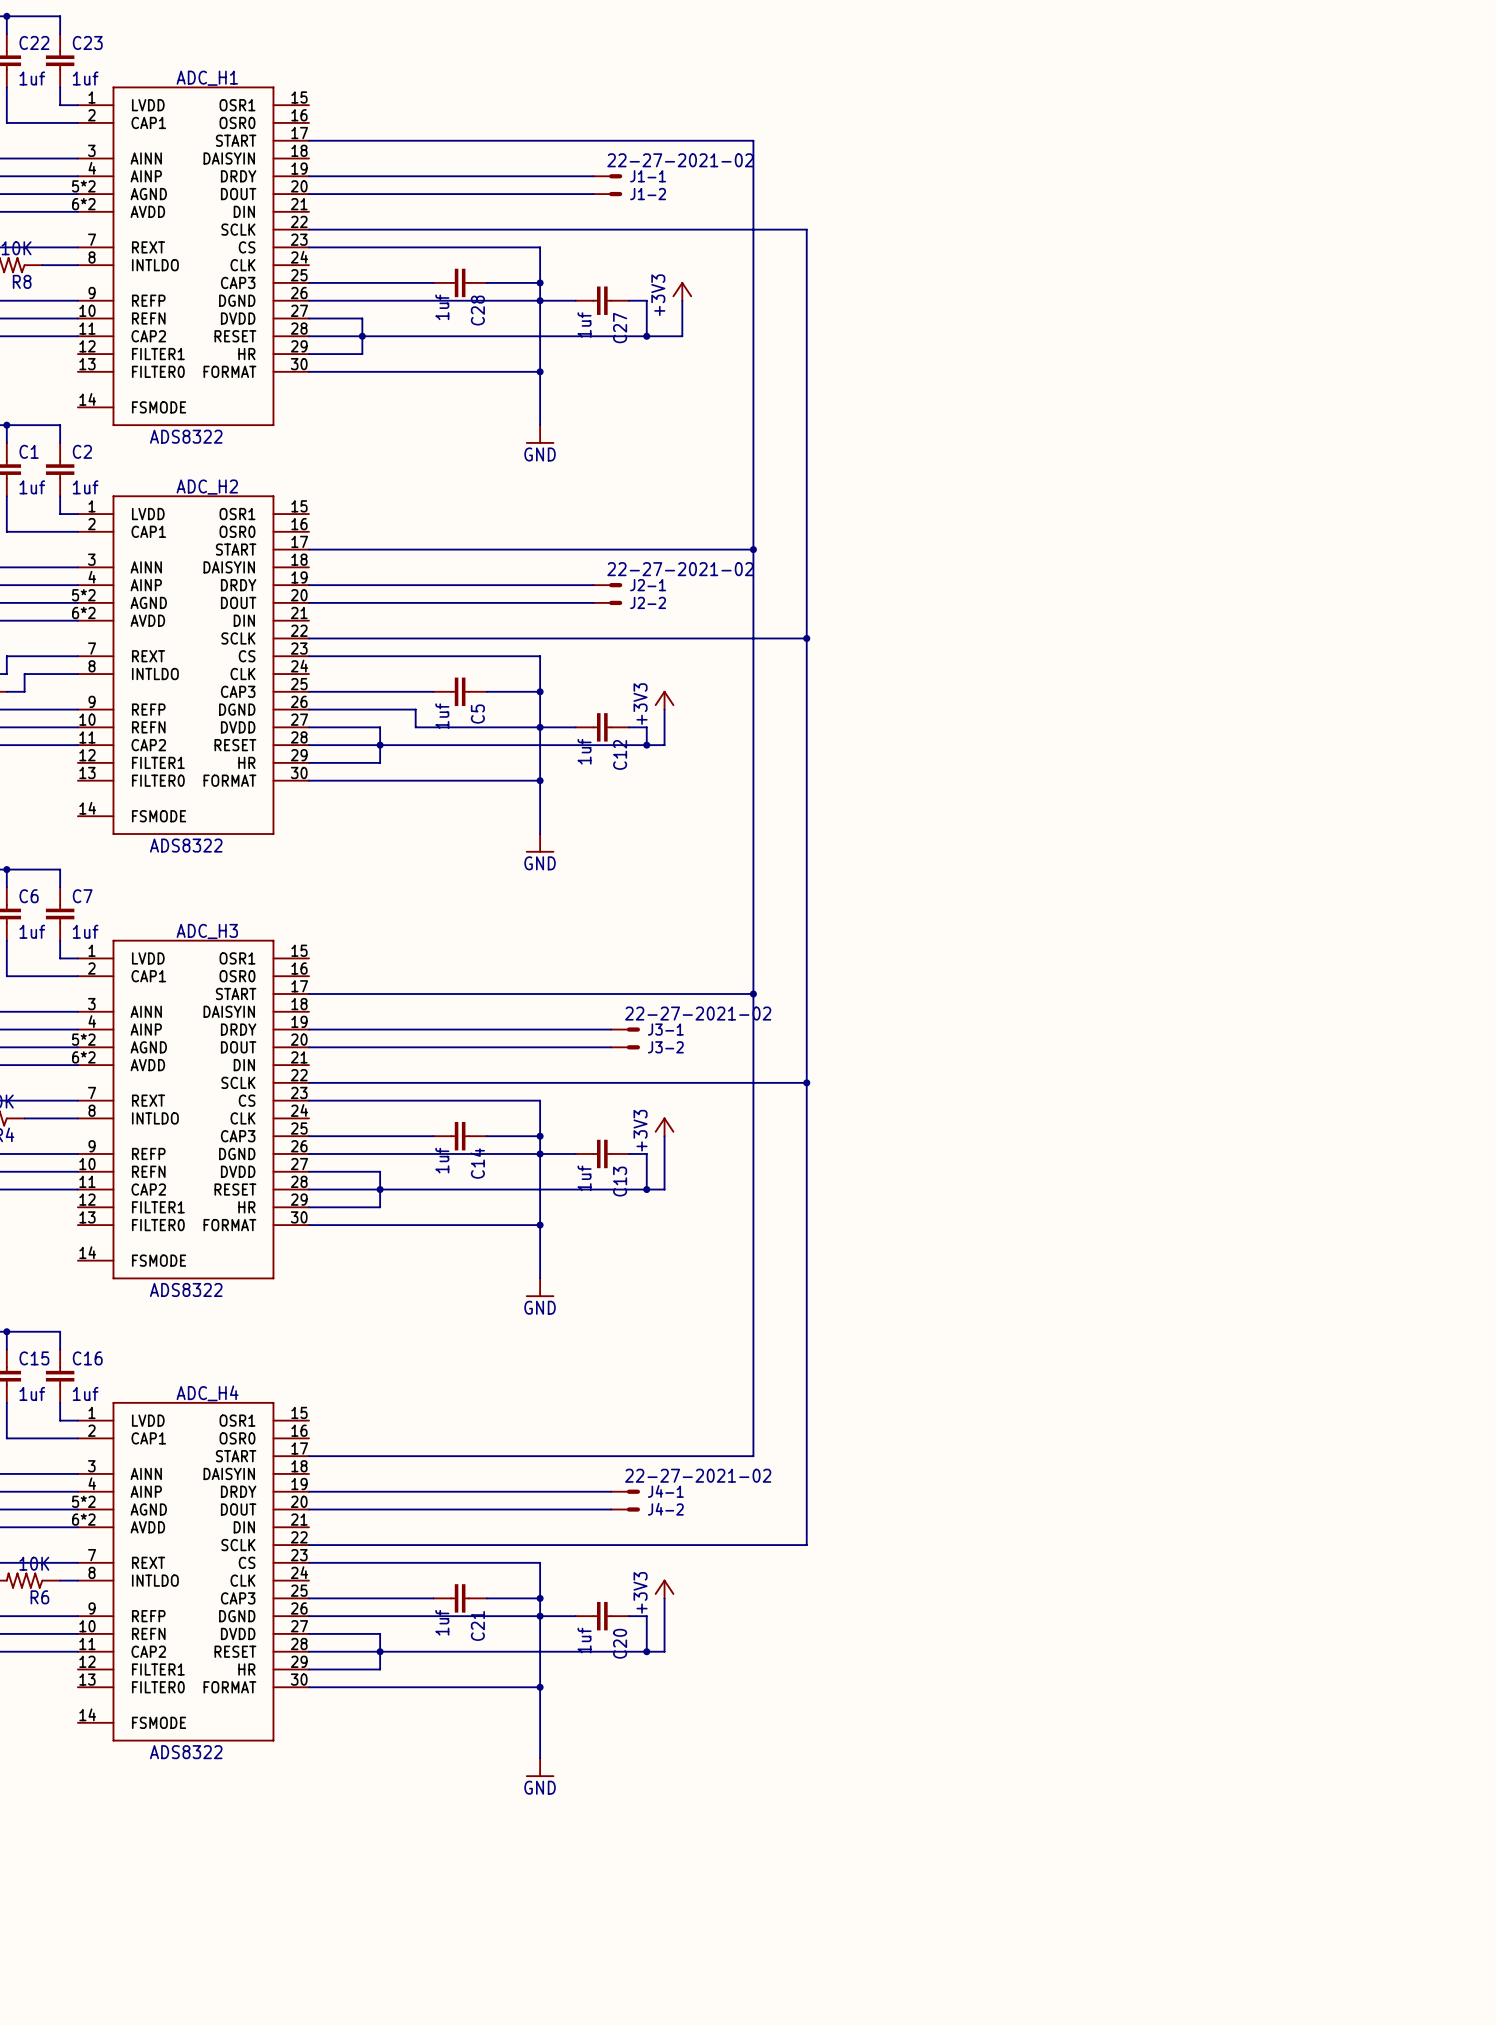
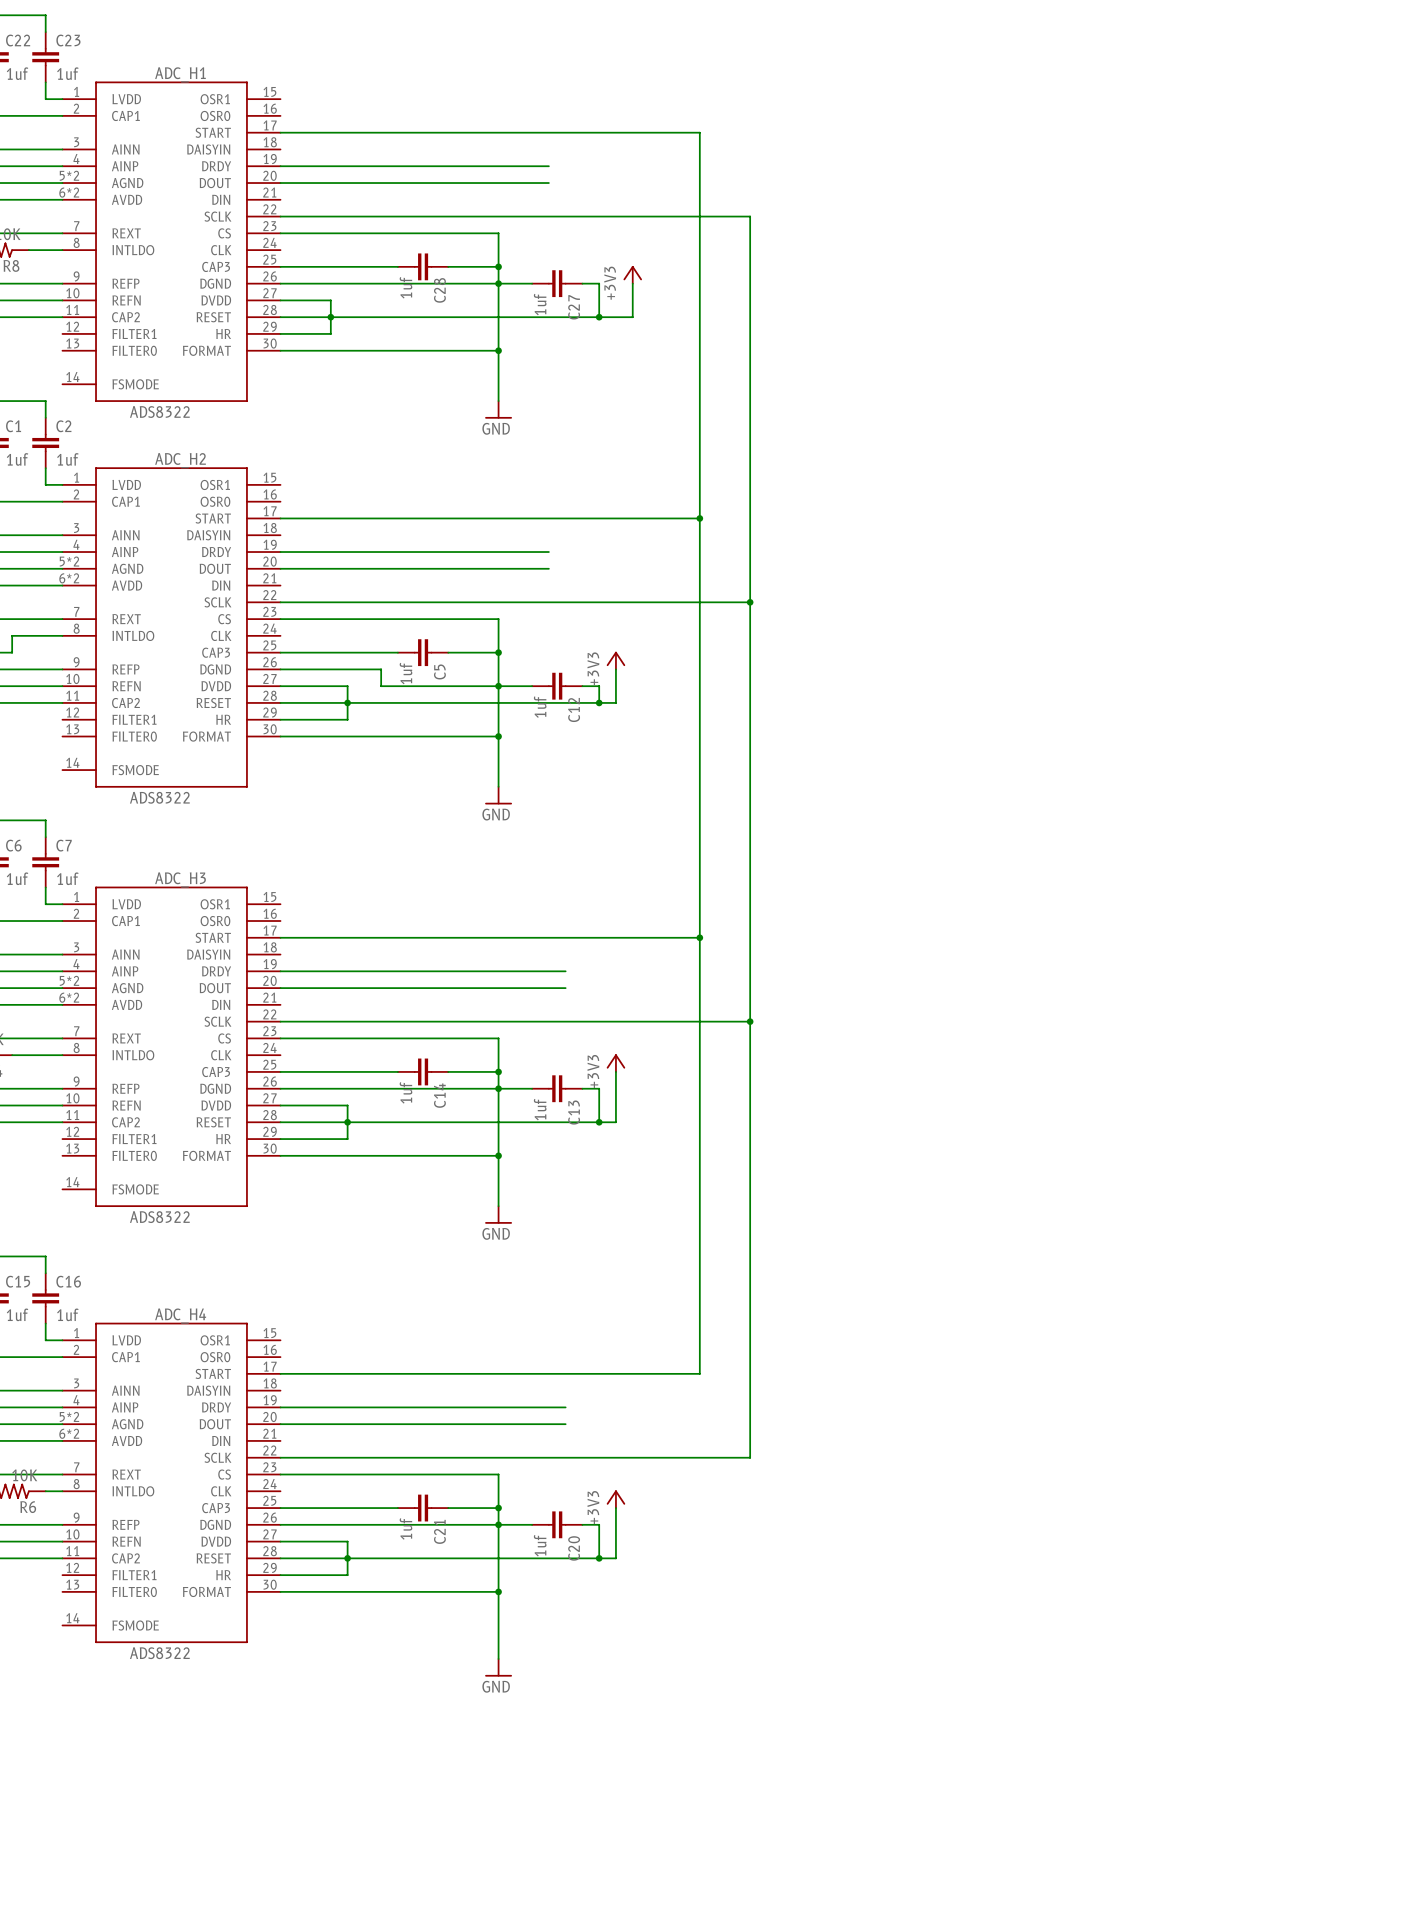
J1-1: 22-27-2021-02 (607, 176) -> none
J1-2: (607, 194) -> none
J2-1: 22-27-2021-02 (607, 585) -> none
J2-2: (607, 602) -> none
J3-1: 22-27-2021-02 (625, 1029) -> none
J3-2: (625, 1047) -> none
J4-1: 22-27-2021-02 (625, 1491) -> none
J4-2: (625, 1509) -> none

